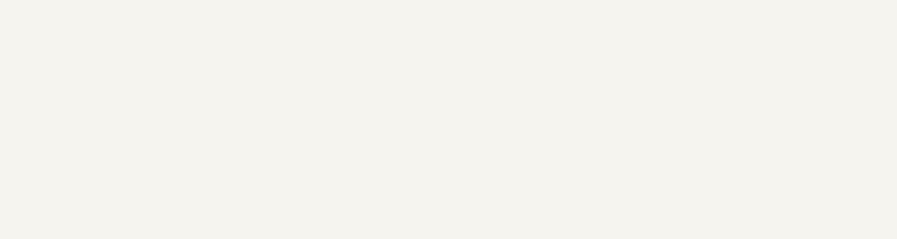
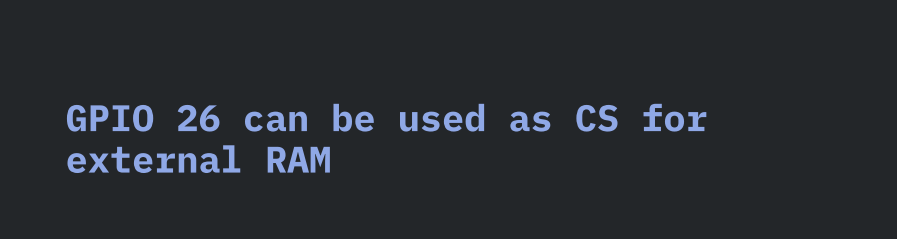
text: none -> GPIO 26 can be used as CS for (386, 117)
text: none -> external RAM (198, 159)

